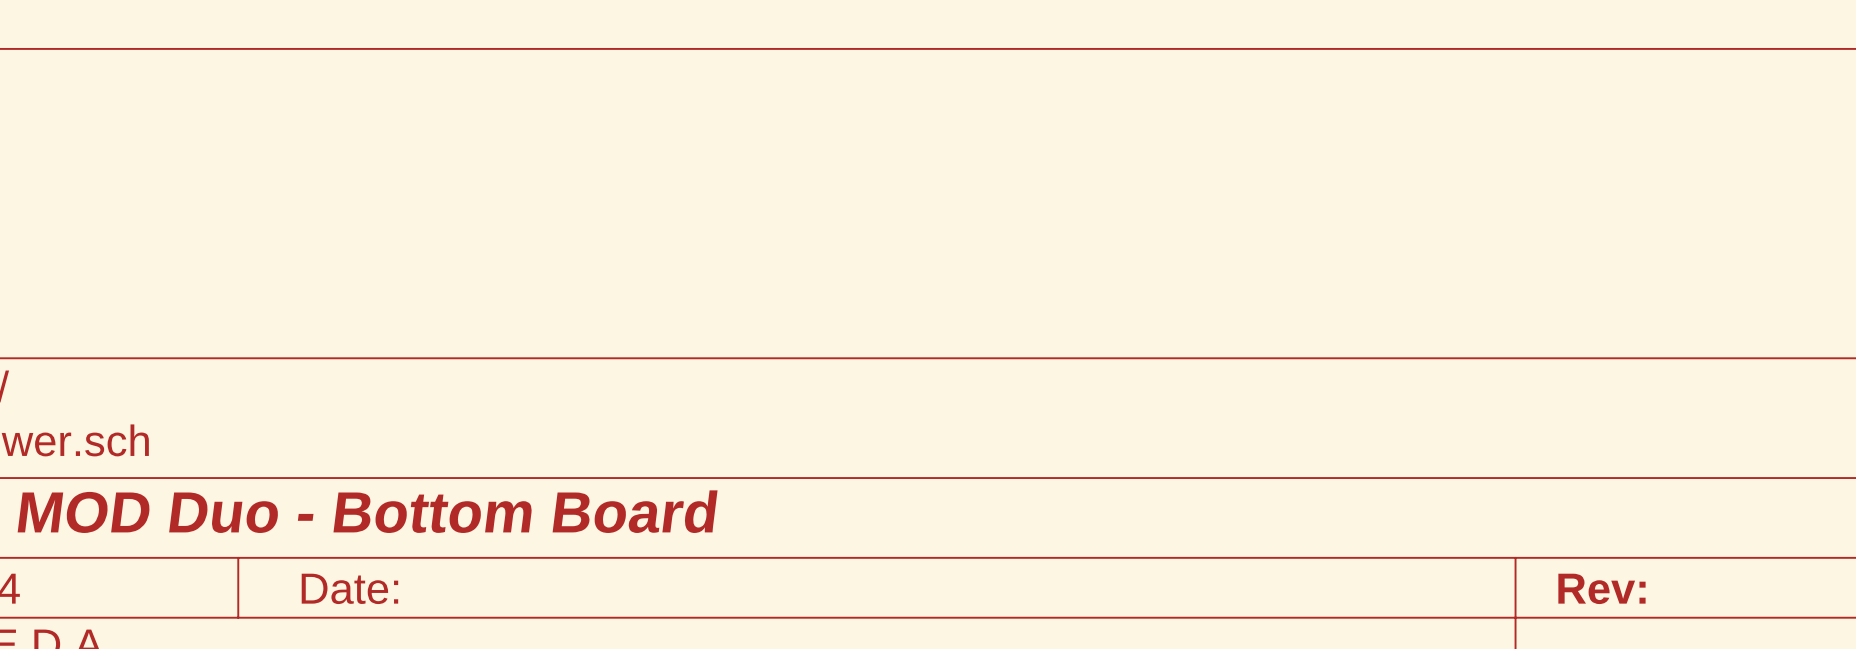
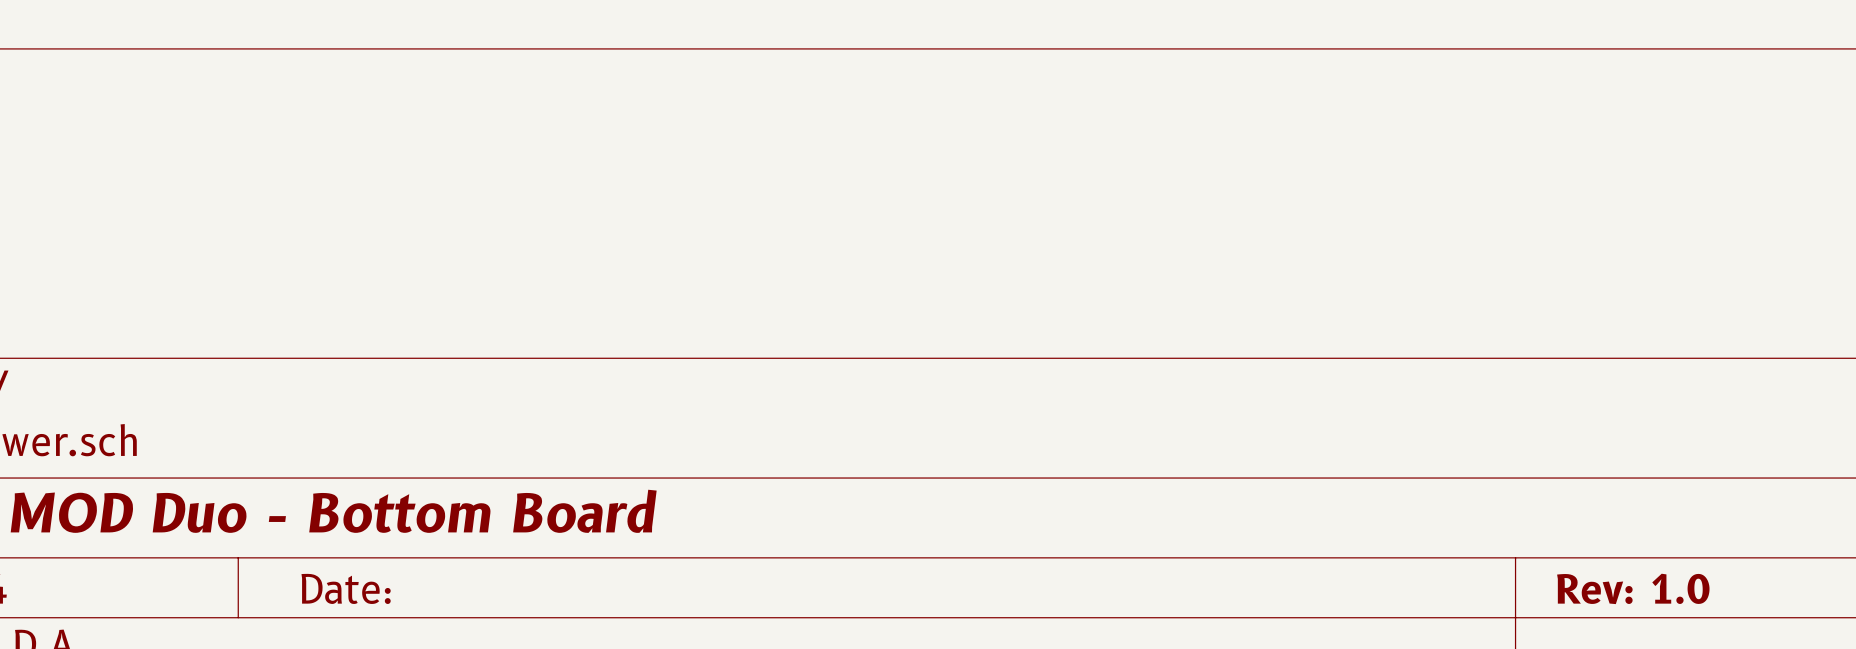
title block: Rev: (1601, 588) -> Rev: 1.0 (1633, 588)

